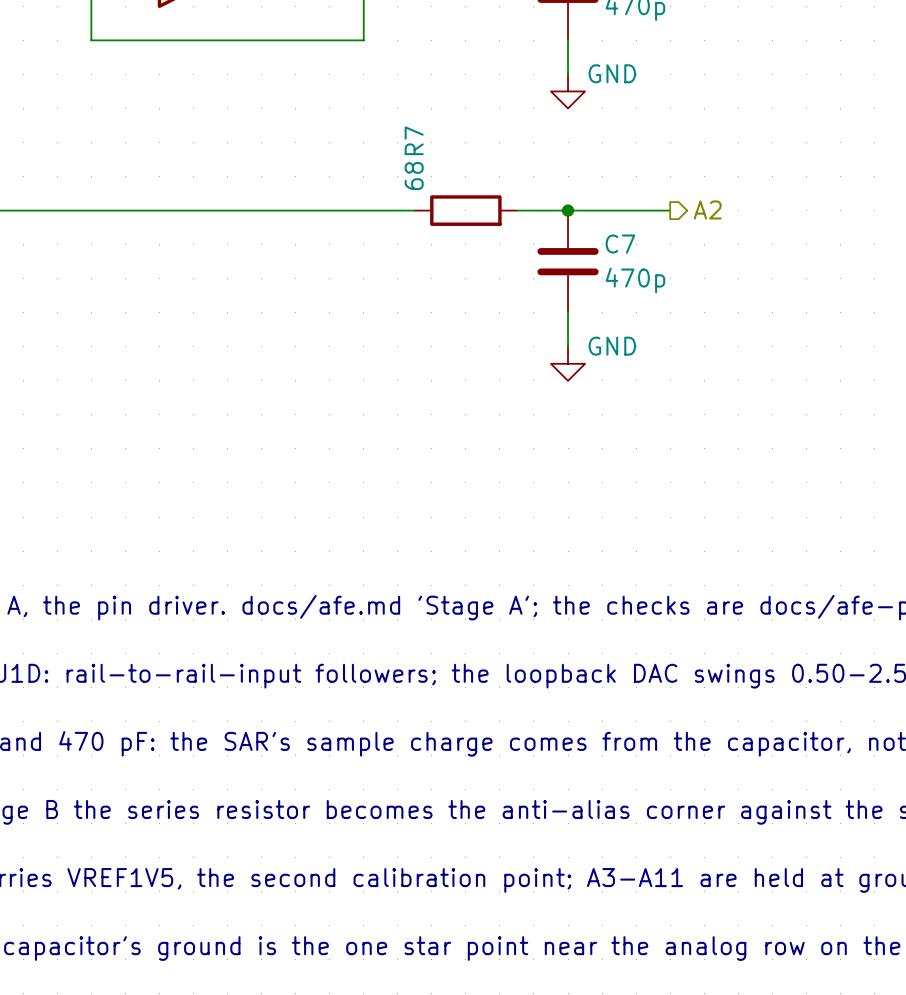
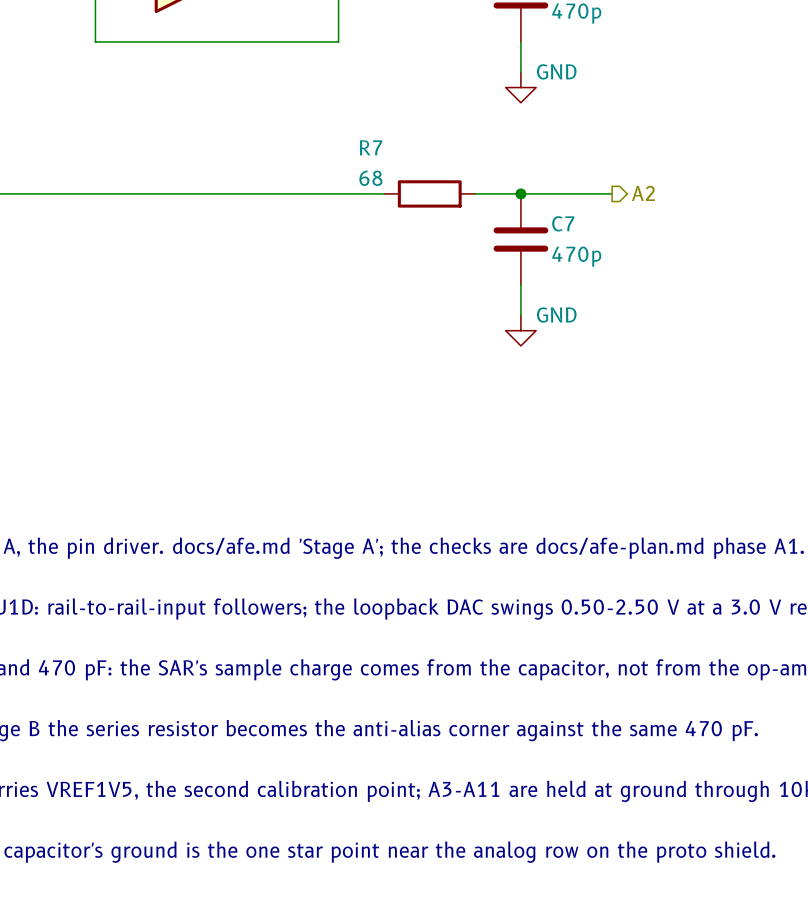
R7 name rotation: 0° (414, 140) -> 90° clockwise (370, 147)
R7 value rotation: 0° (414, 176) -> 90° clockwise (370, 178)

